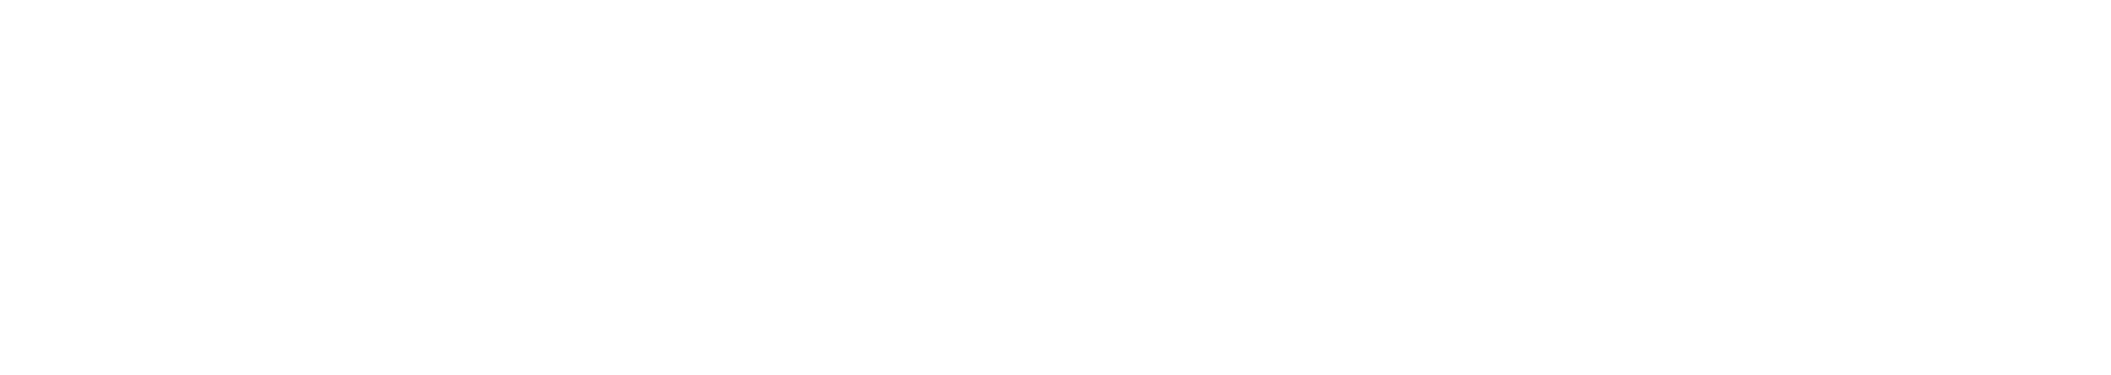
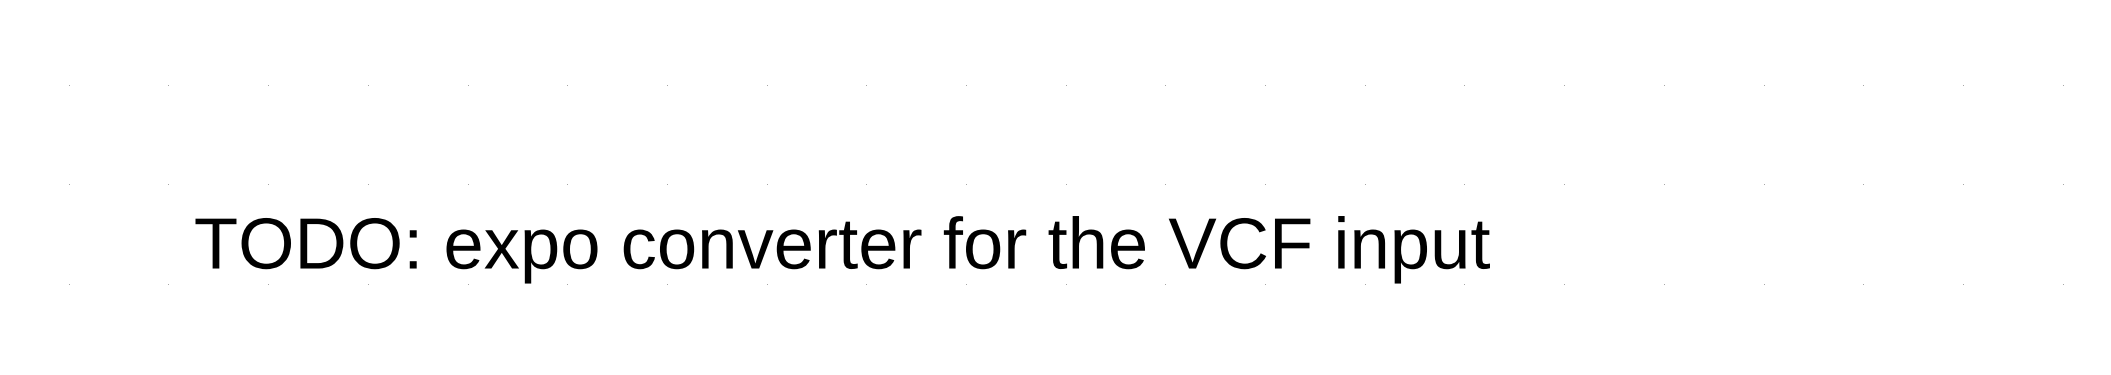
text: none -> TODO: expo converter for the VCF input (842, 249)

